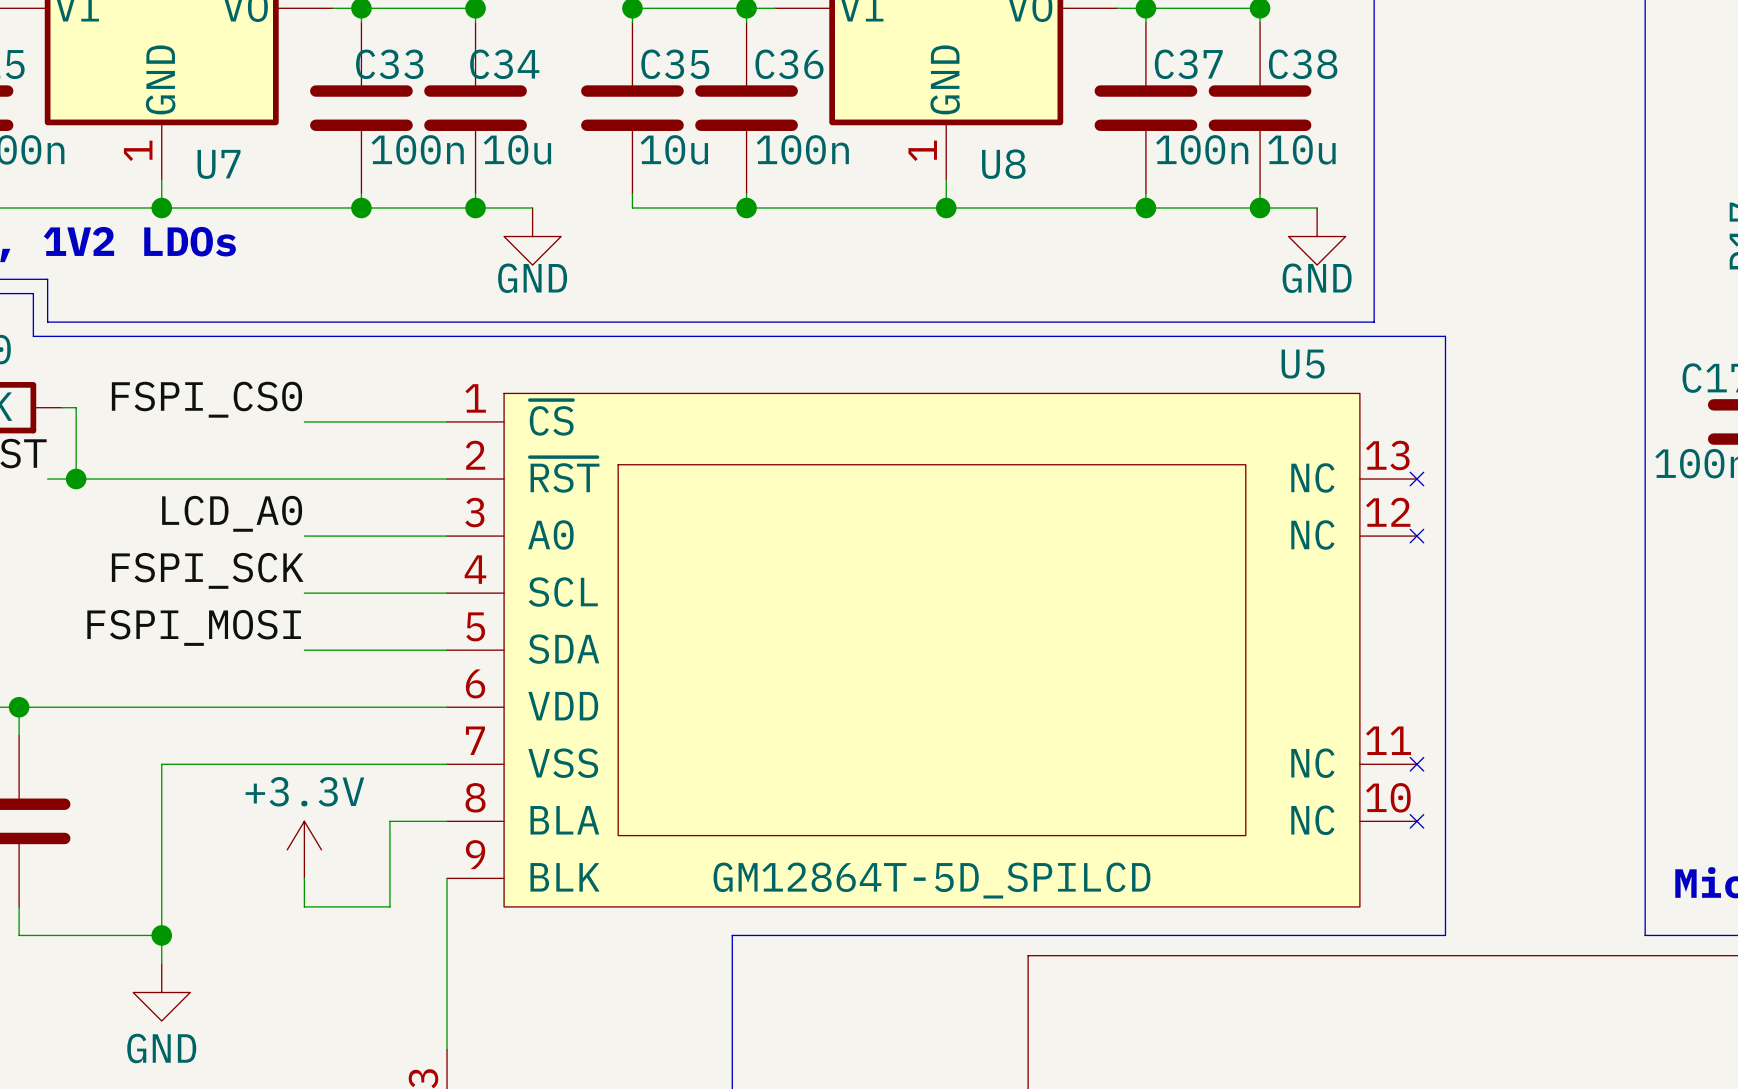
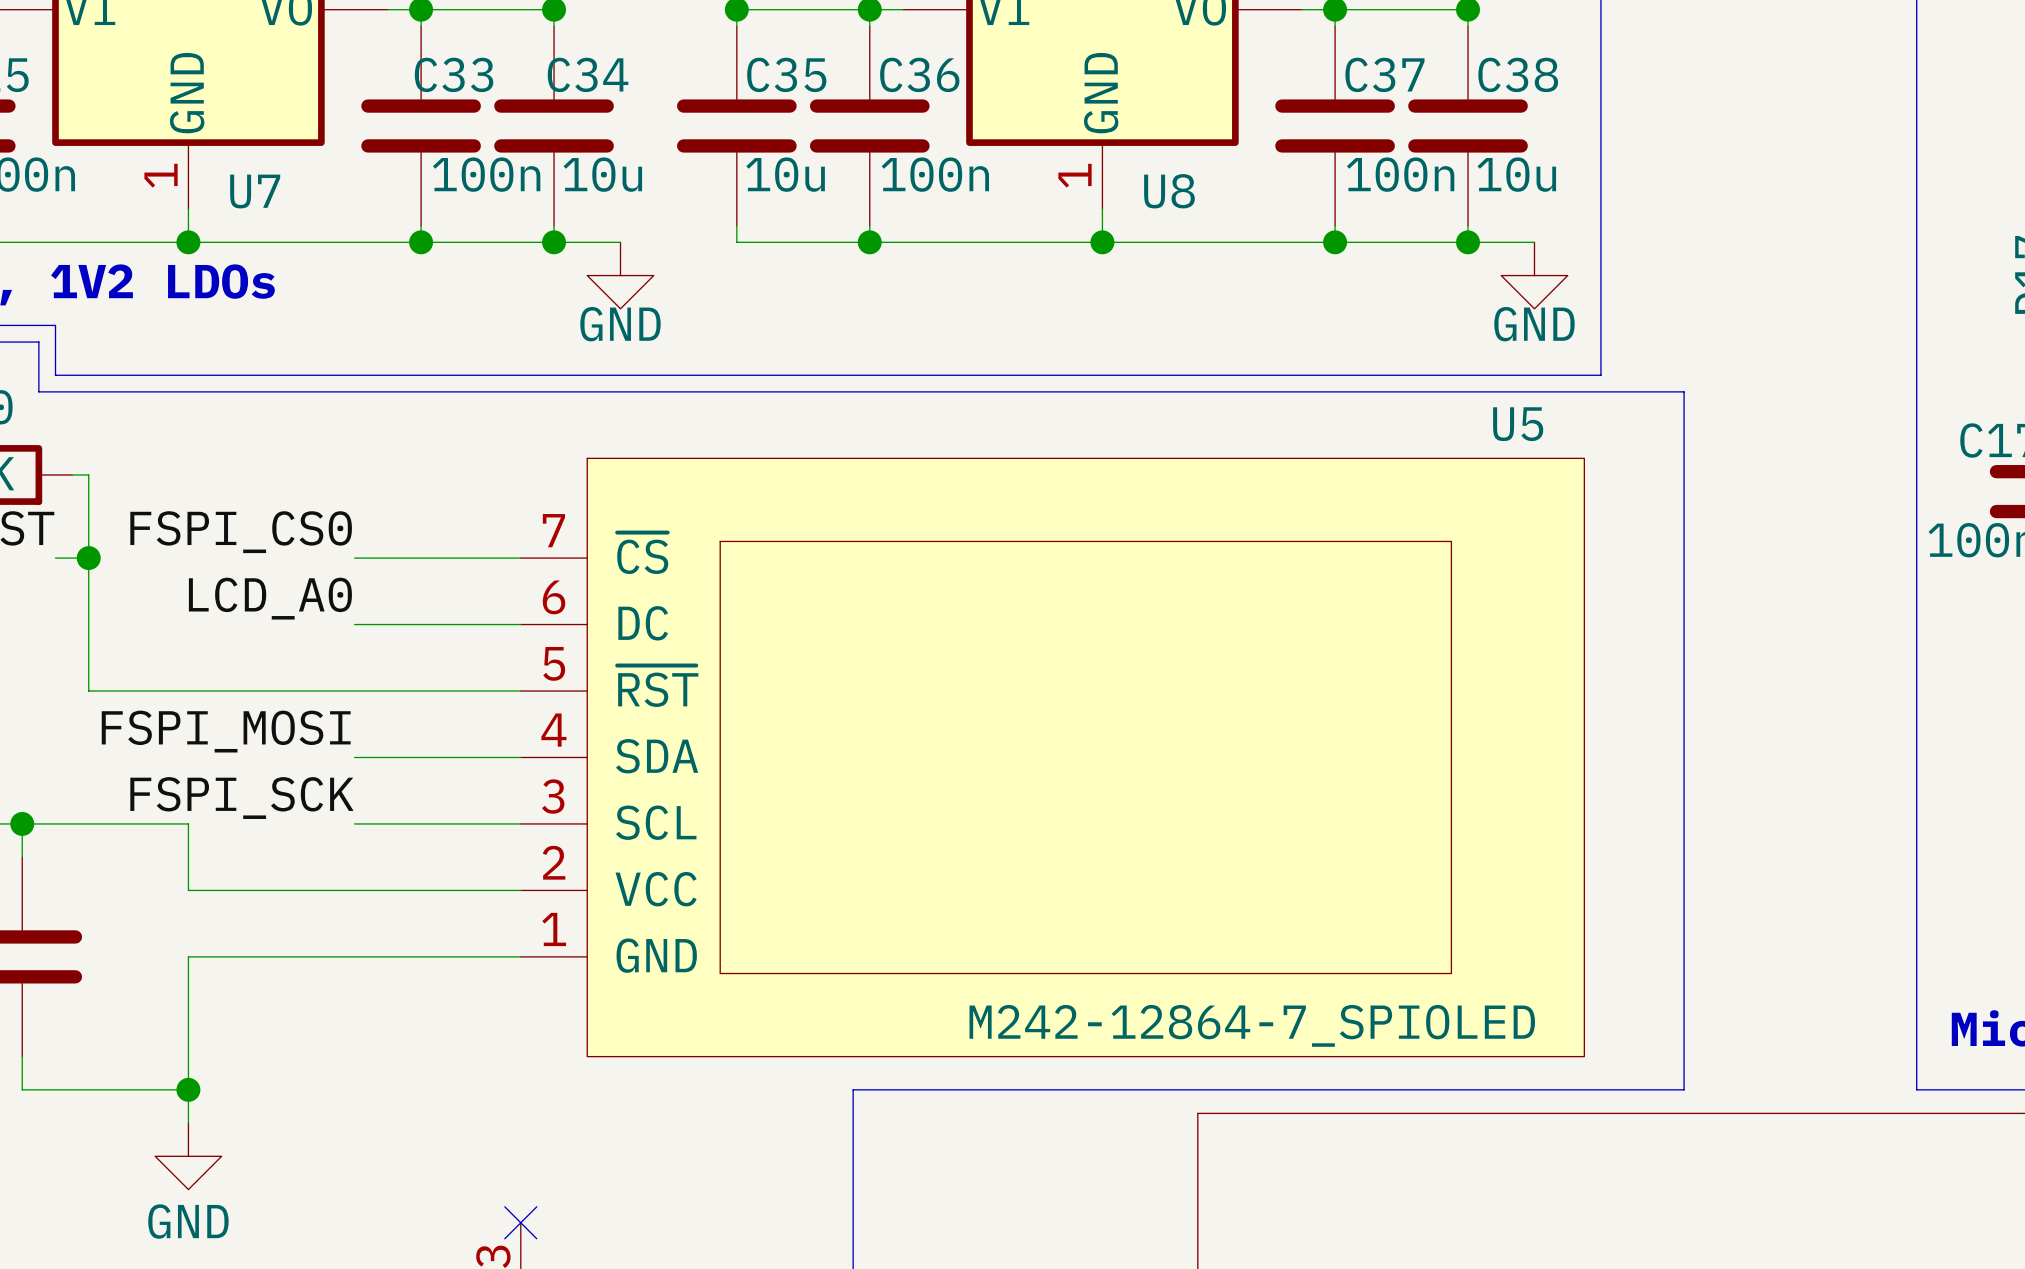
U5 symbol: [447, 393, 1424, 907] -> [520, 458, 1585, 1057]
label position: FSPI_CS0 (206, 399) -> FSPI_CS0 (241, 532)
wire: (304, 421) (447, 421) -> none
wire: (76, 479) (304, 479) -> (88, 558) (88, 691) (354, 691)
label position: FSPI_SCK (207, 570) -> FSPI_SCK (241, 798)
wire: (161, 707) (304, 707) -> none
wire: (161, 764) (161, 821) -> (188, 890) (188, 823)
wire: (389, 821) (389, 906) (304, 906) (304, 878) -> (454, 956) (188, 956)
power symbol: +3.3V (304, 849) -> none
wire: (447, 878) (447, 1049) -> none
U5 value: GM12864T-5D_SPILCD (931, 880) -> M242-12864-7_SPIOLED (1252, 1025)
no-connect mark: none -> (520, 1222)

